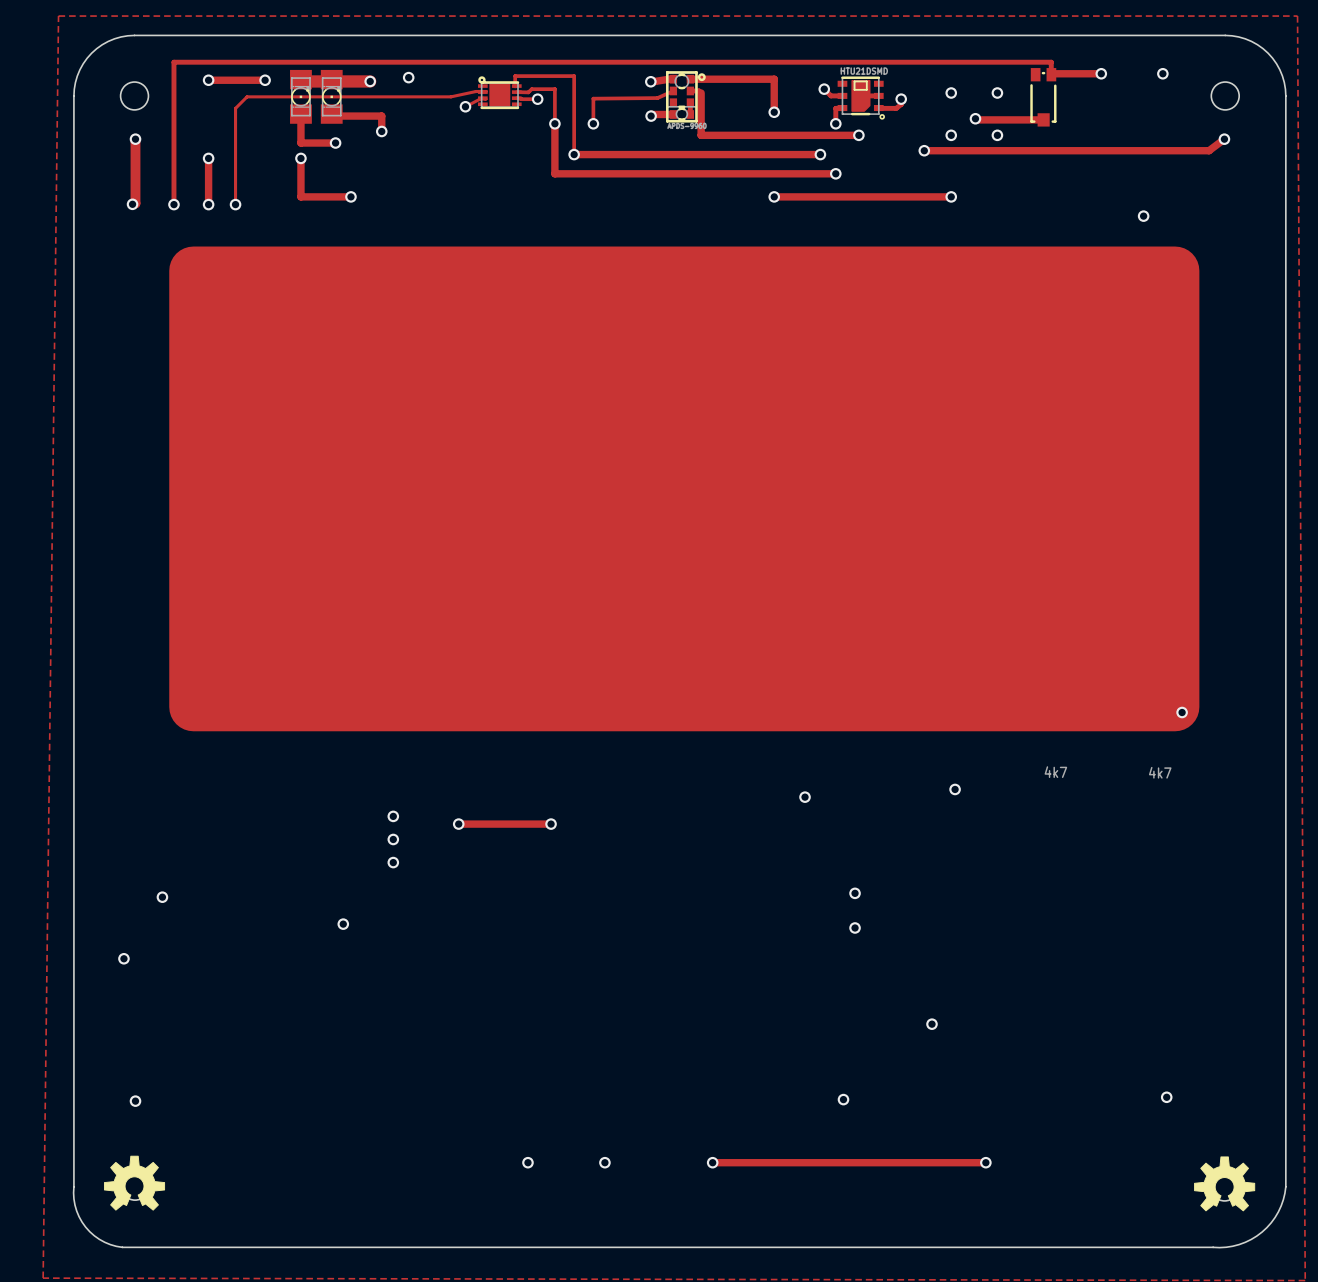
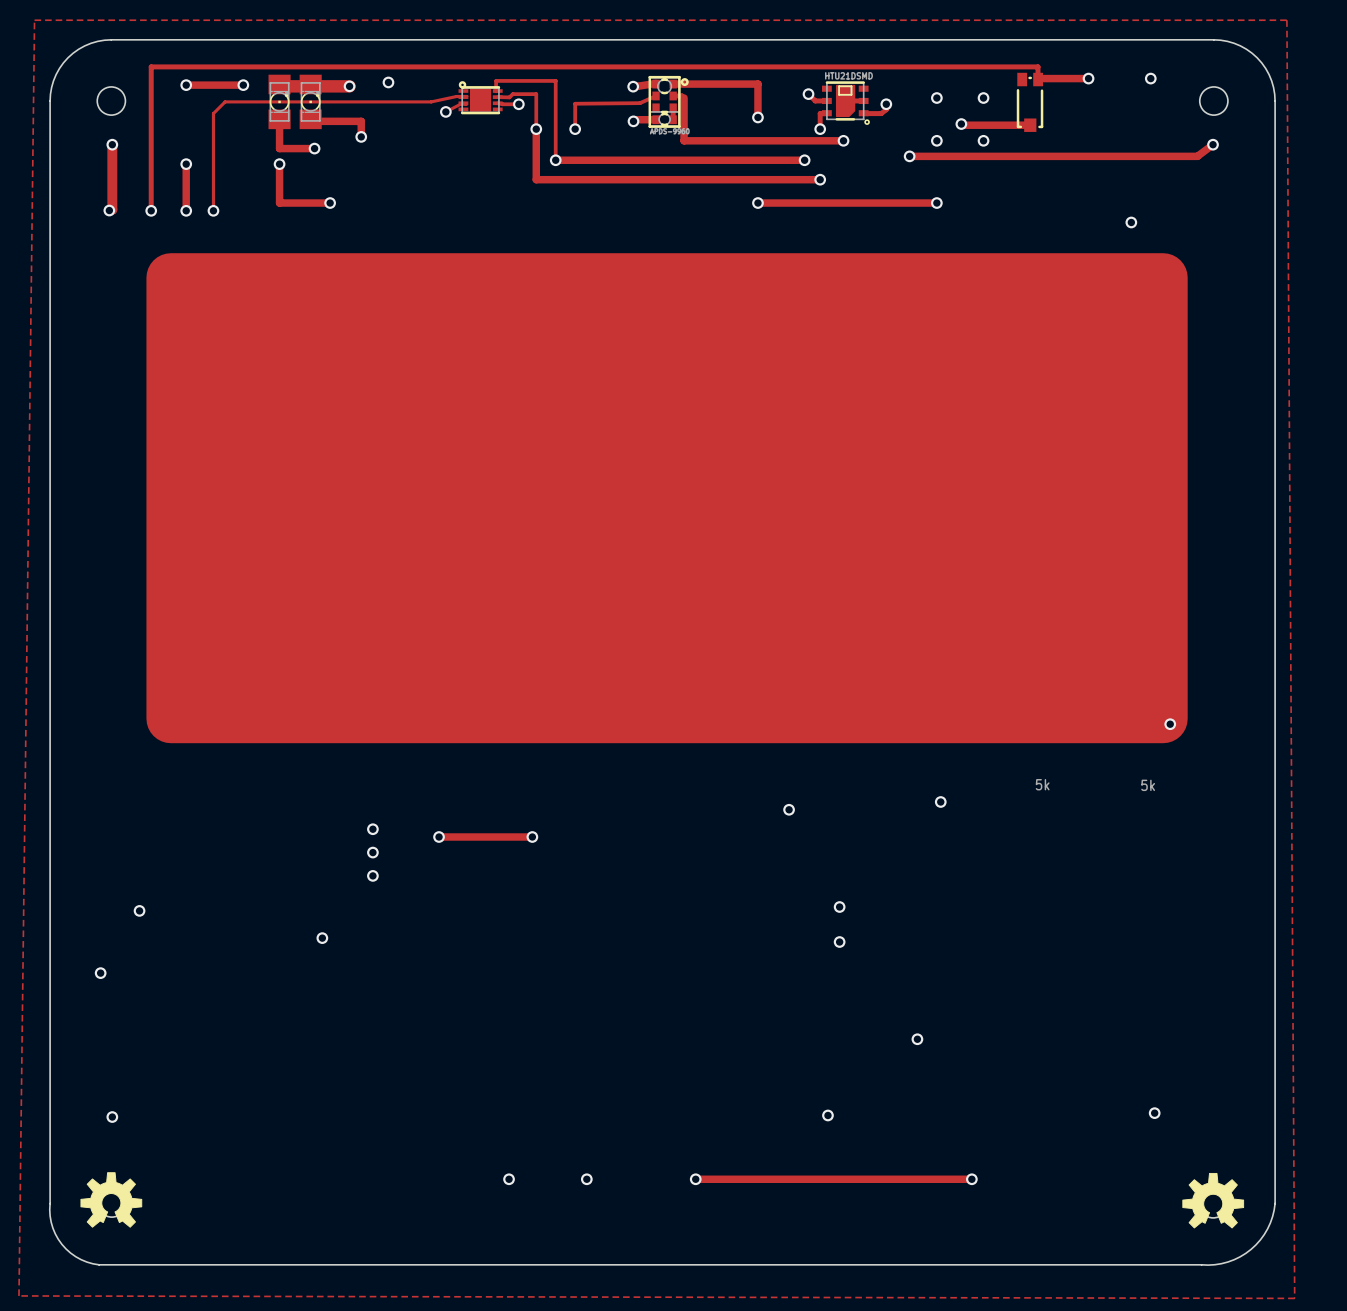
part value: 4k7 (1055, 772) -> 5k (1042, 784)
part value: 4k7 (1160, 772) -> 5k (1148, 785)

